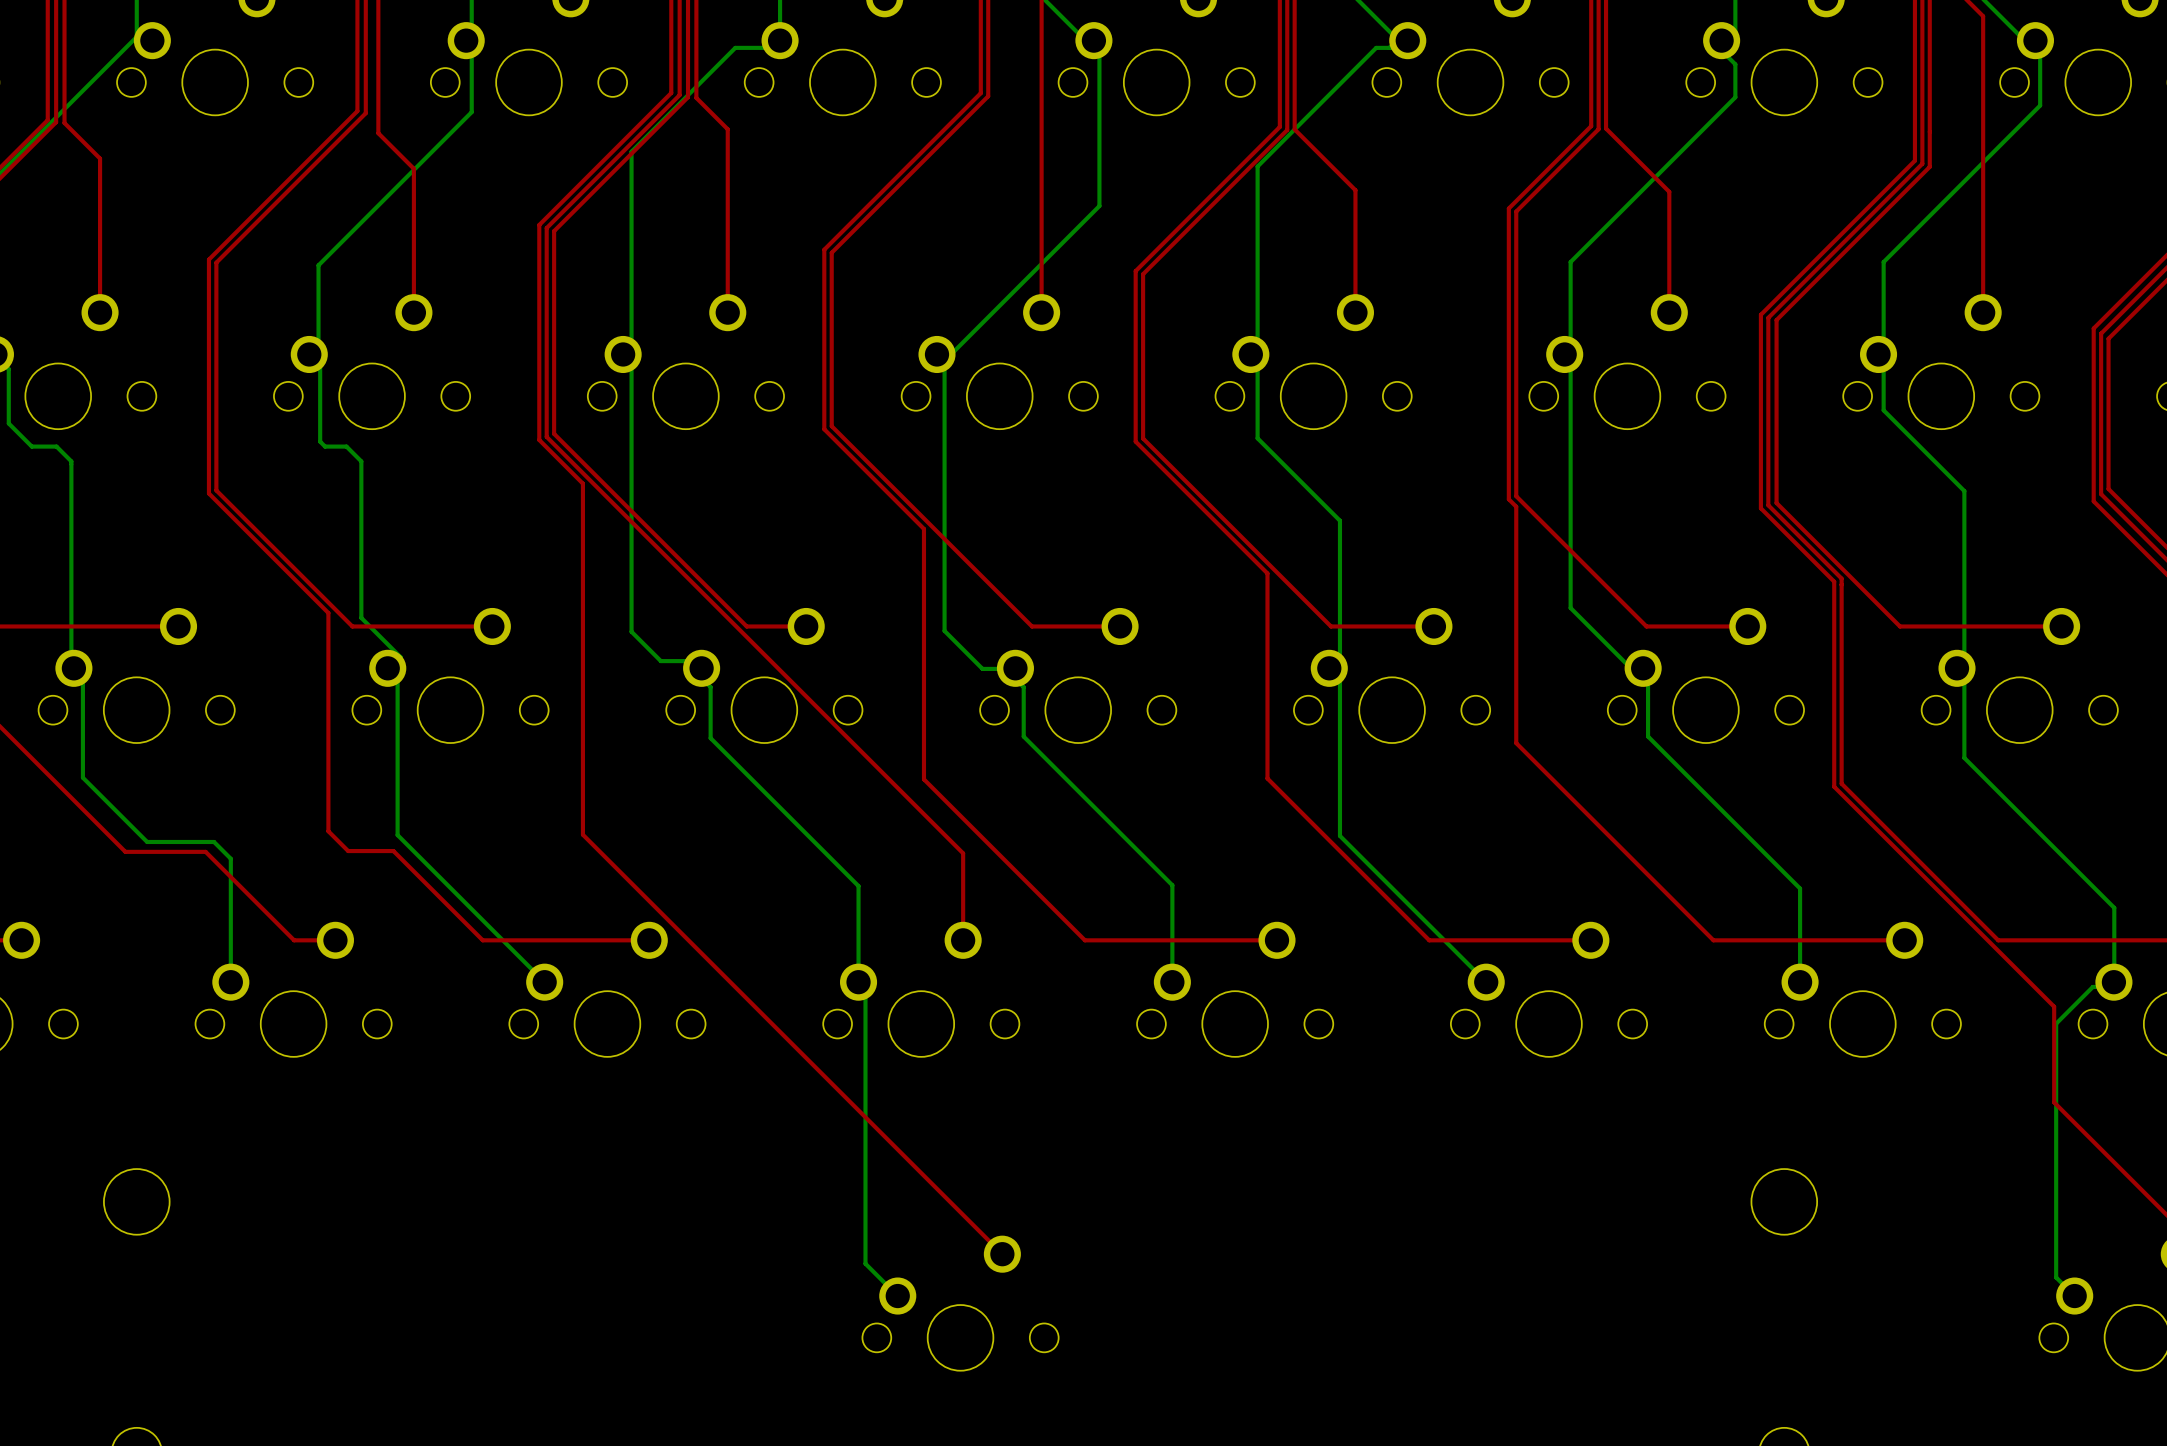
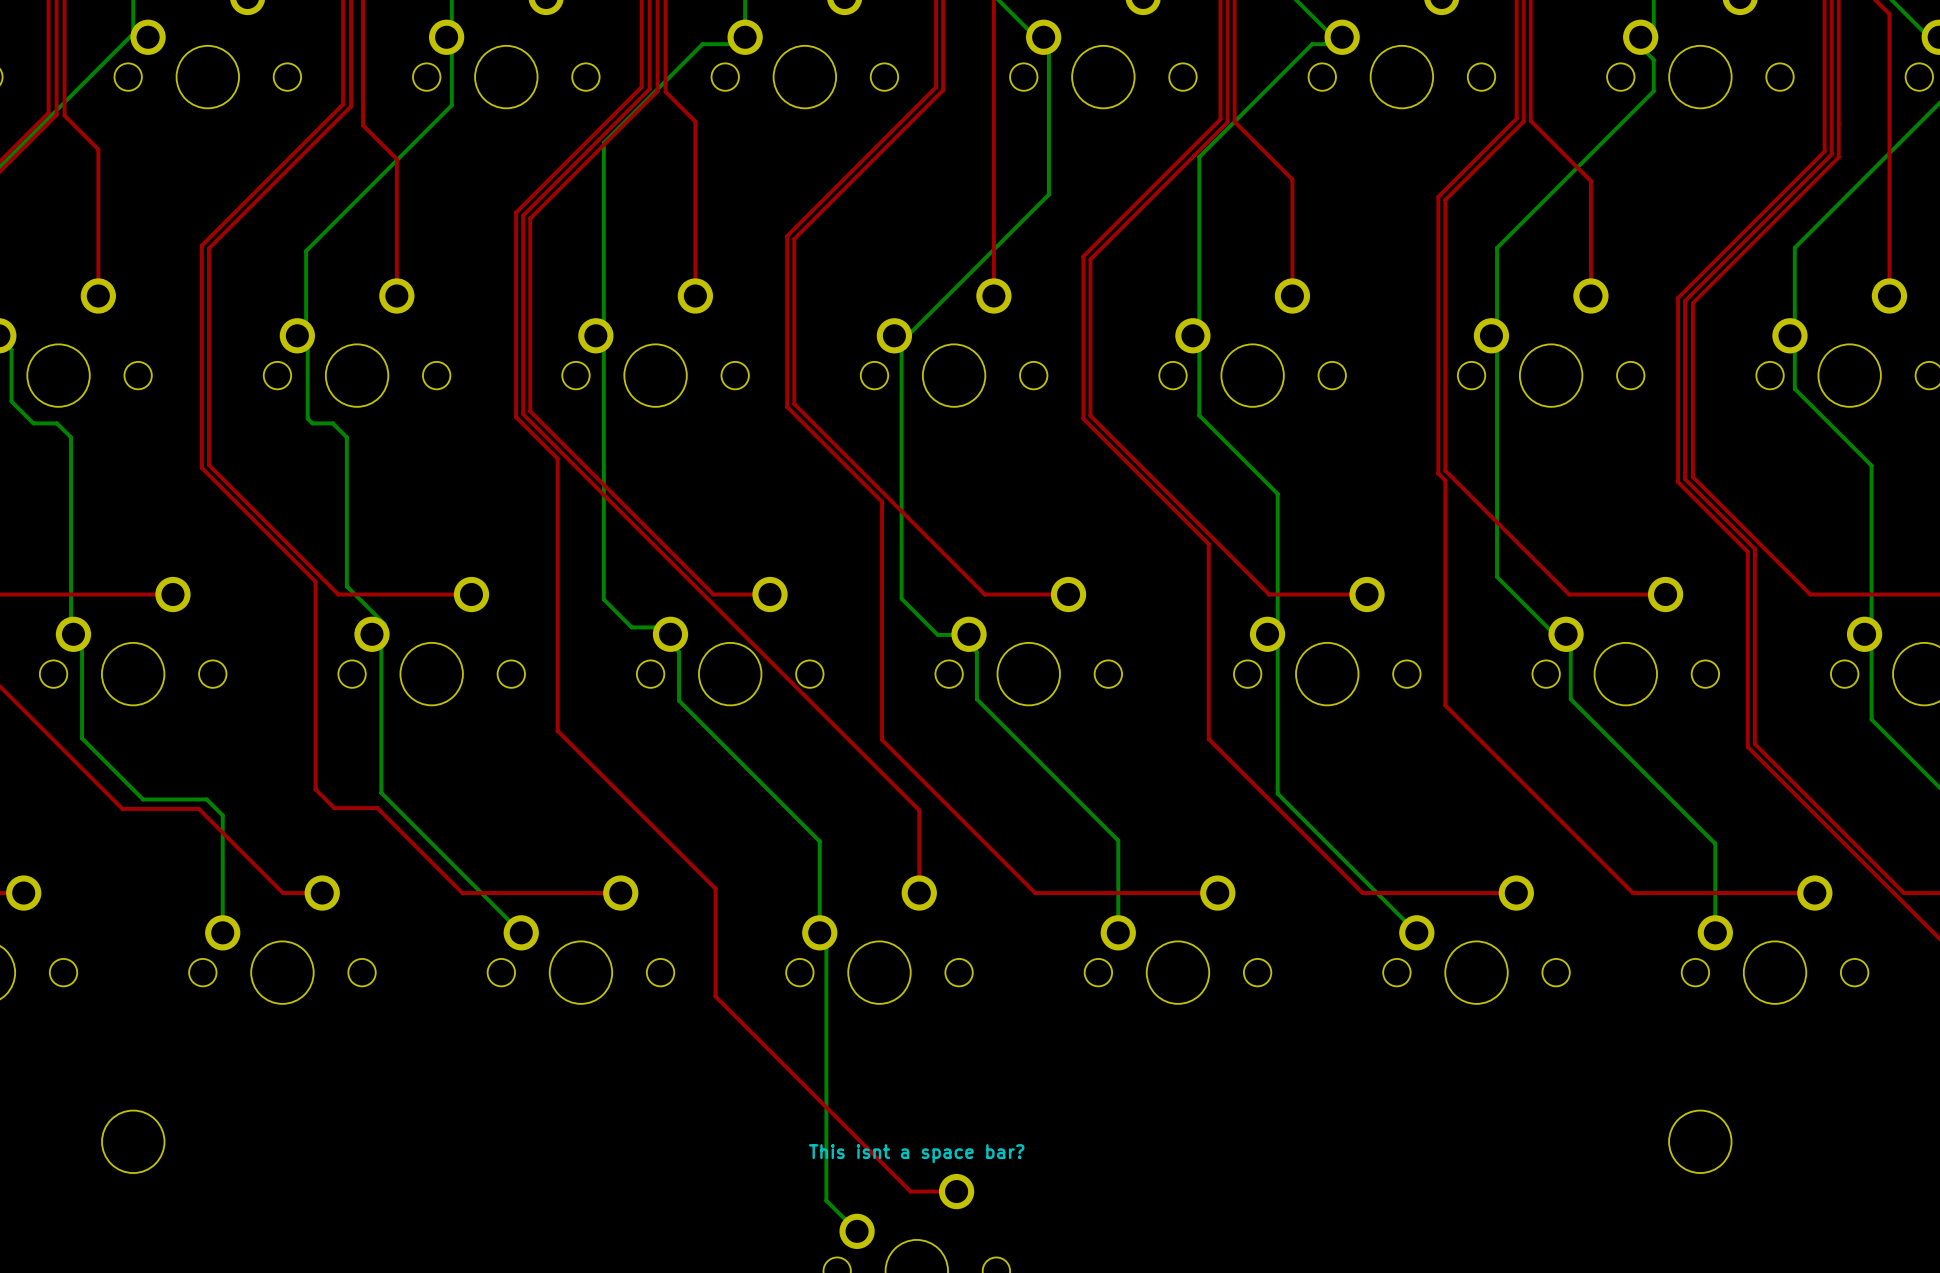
top track: (582, 769) (582, 834) (1002, 1254) -> (557, 730) (715, 888) (715, 996) (910, 1191) (956, 1191)
text: none -> This isnt a space bar? (916, 1153)

